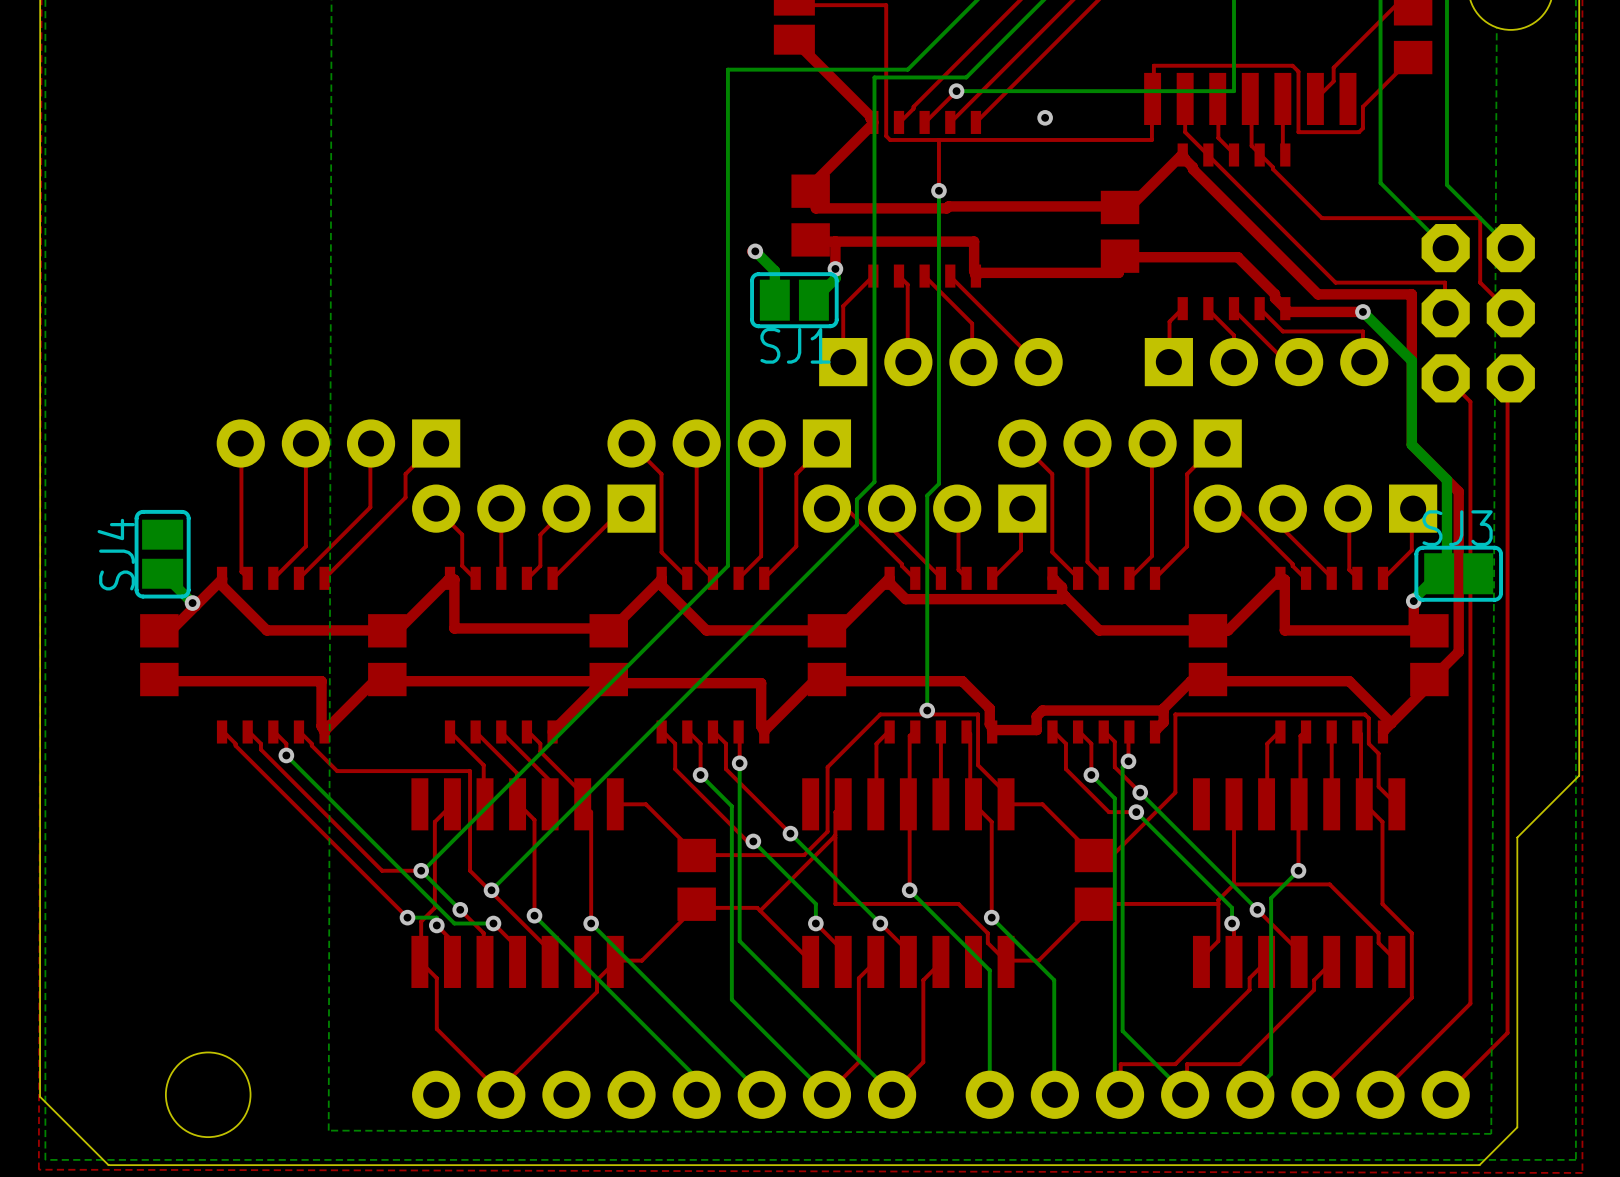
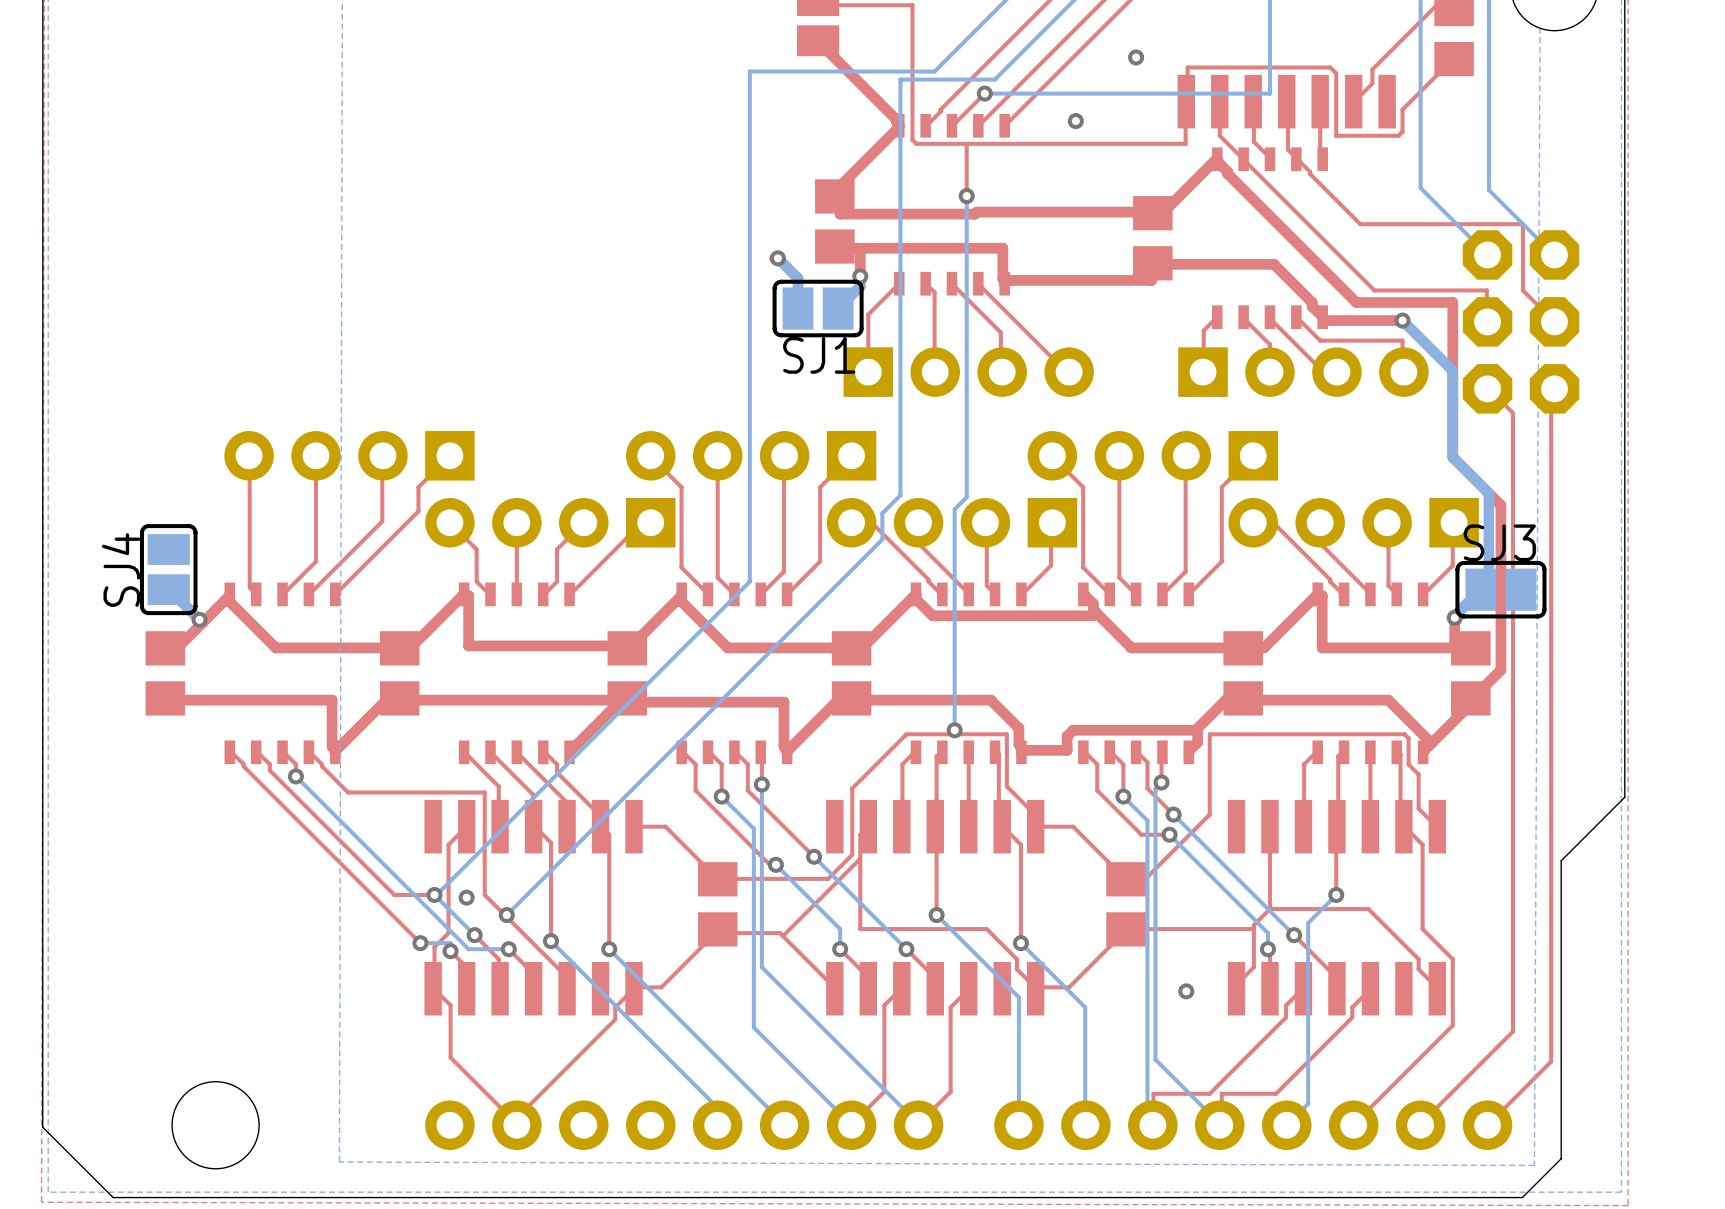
via: none -> (1136, 57)
via: none -> (466, 897)
via: none -> (1186, 991)

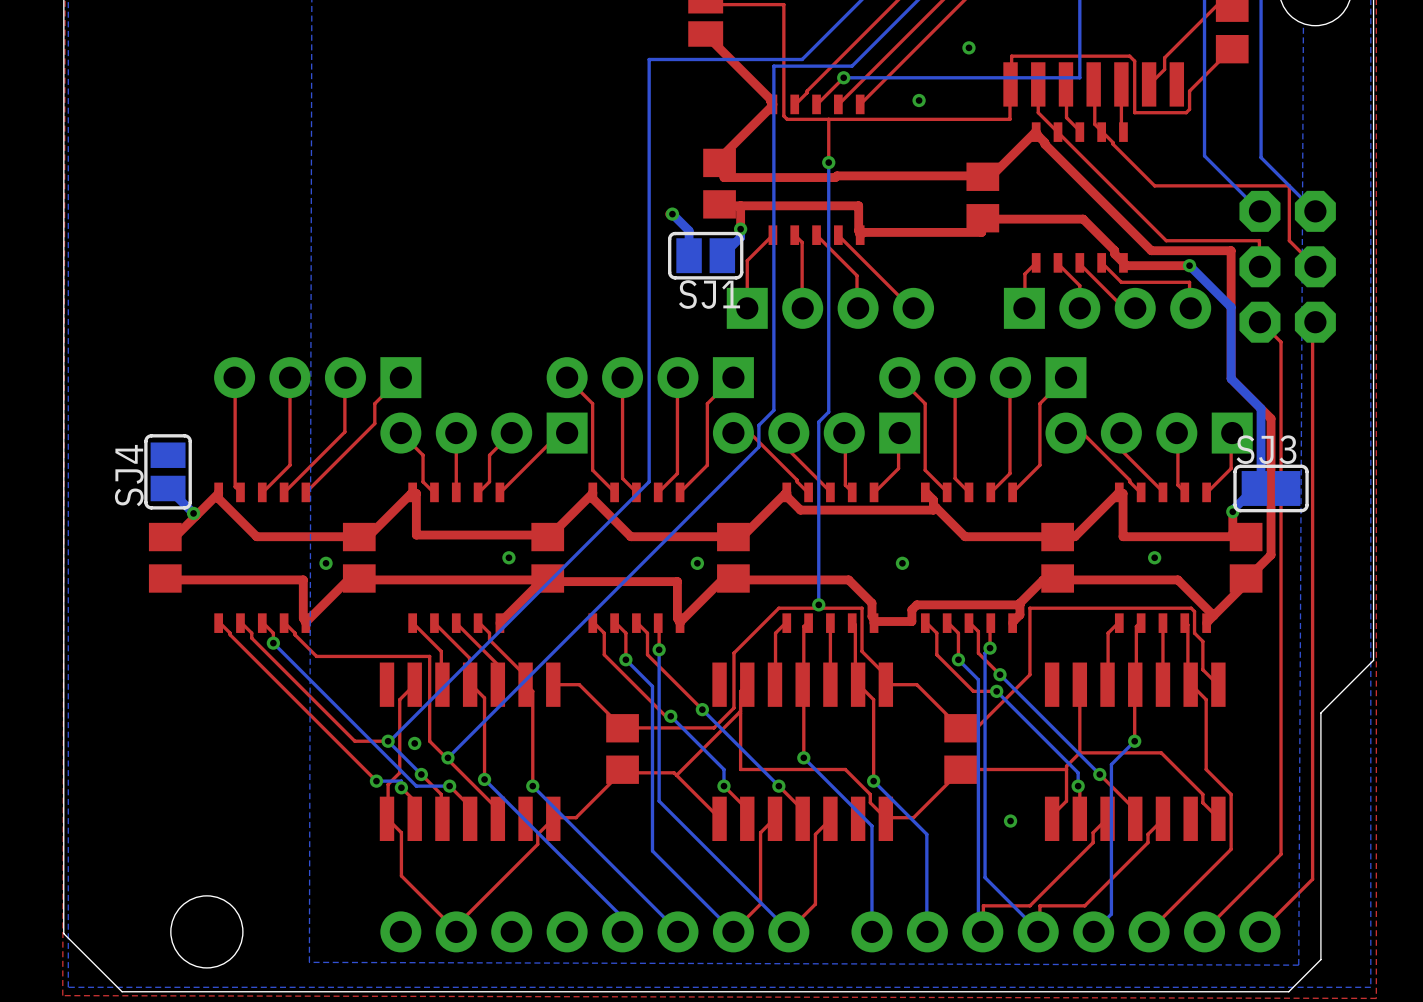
via: none -> (508, 557)
via: none -> (1154, 557)
via: none -> (326, 563)
via: none -> (697, 563)
via: none -> (902, 563)

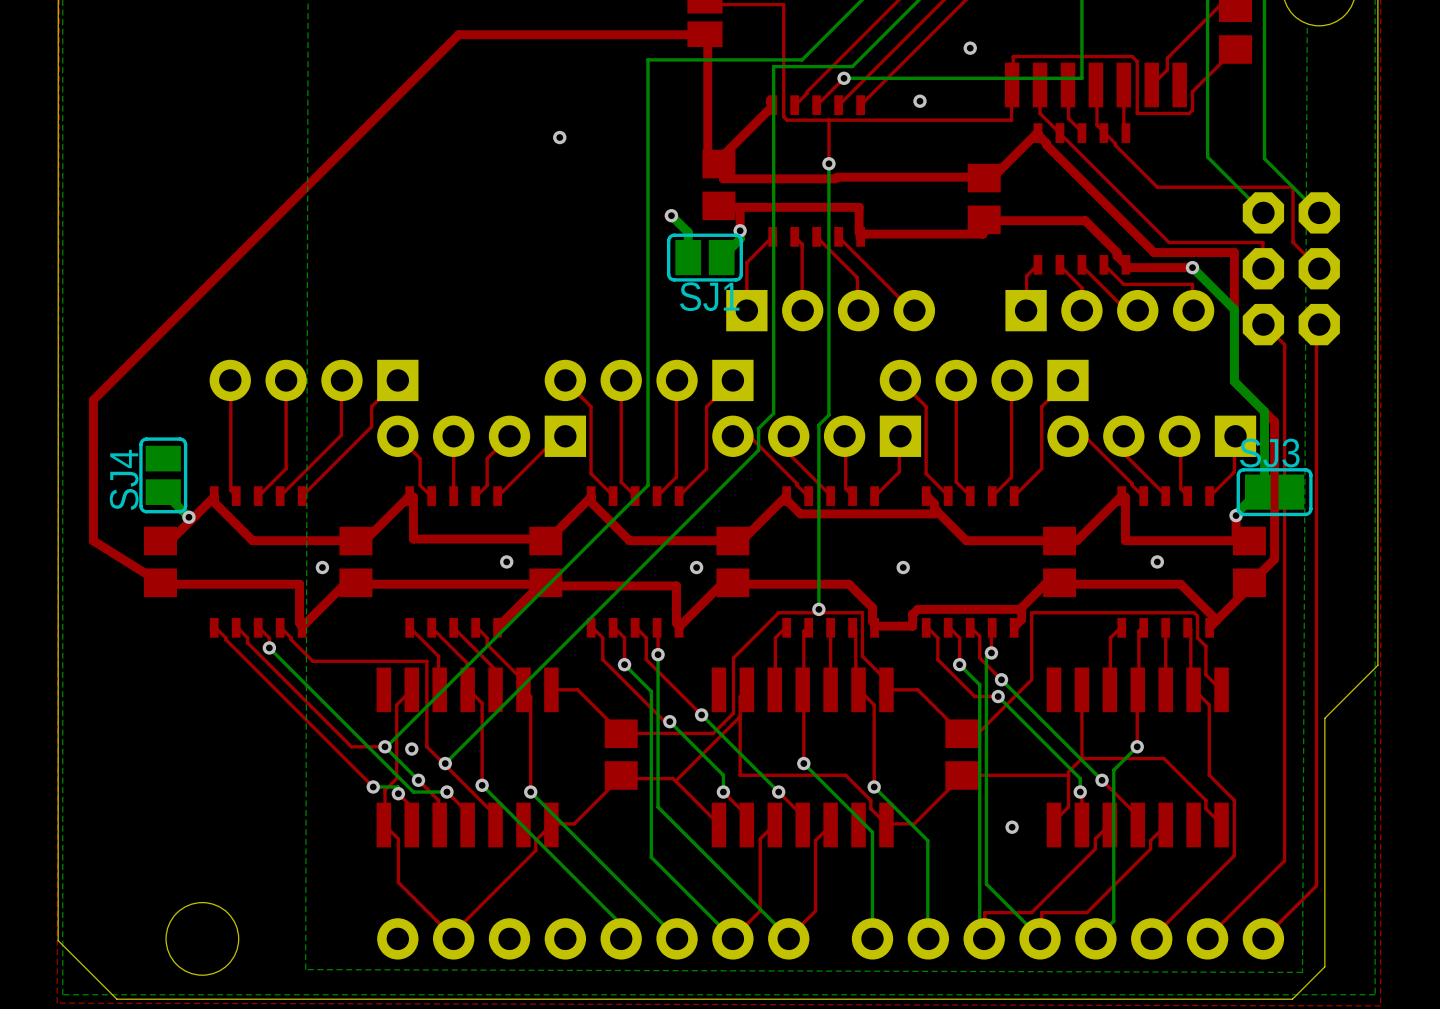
top track: (705, 34) (770, 99) -> (704, 34) (458, 34) (93, 399) (93, 540) (160, 582)
top track: none -> (707, 36) (707, 165)
via: none -> (559, 137)

